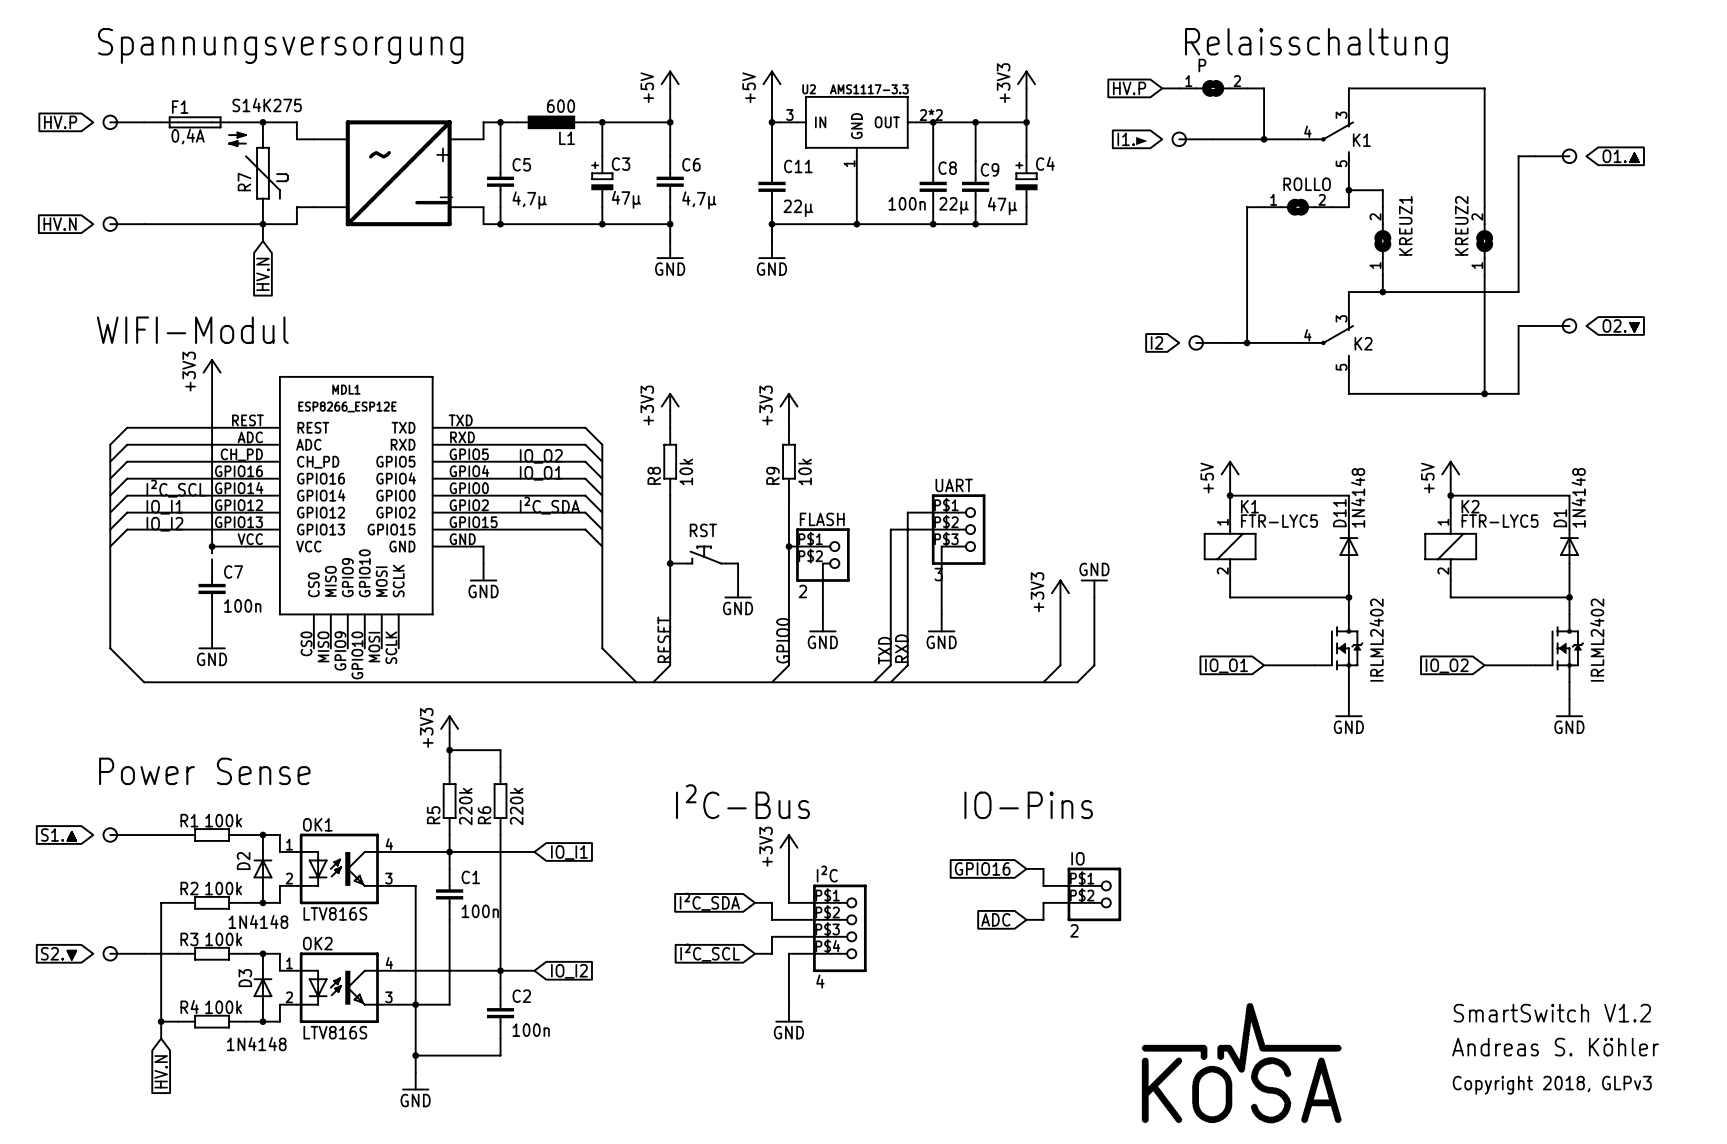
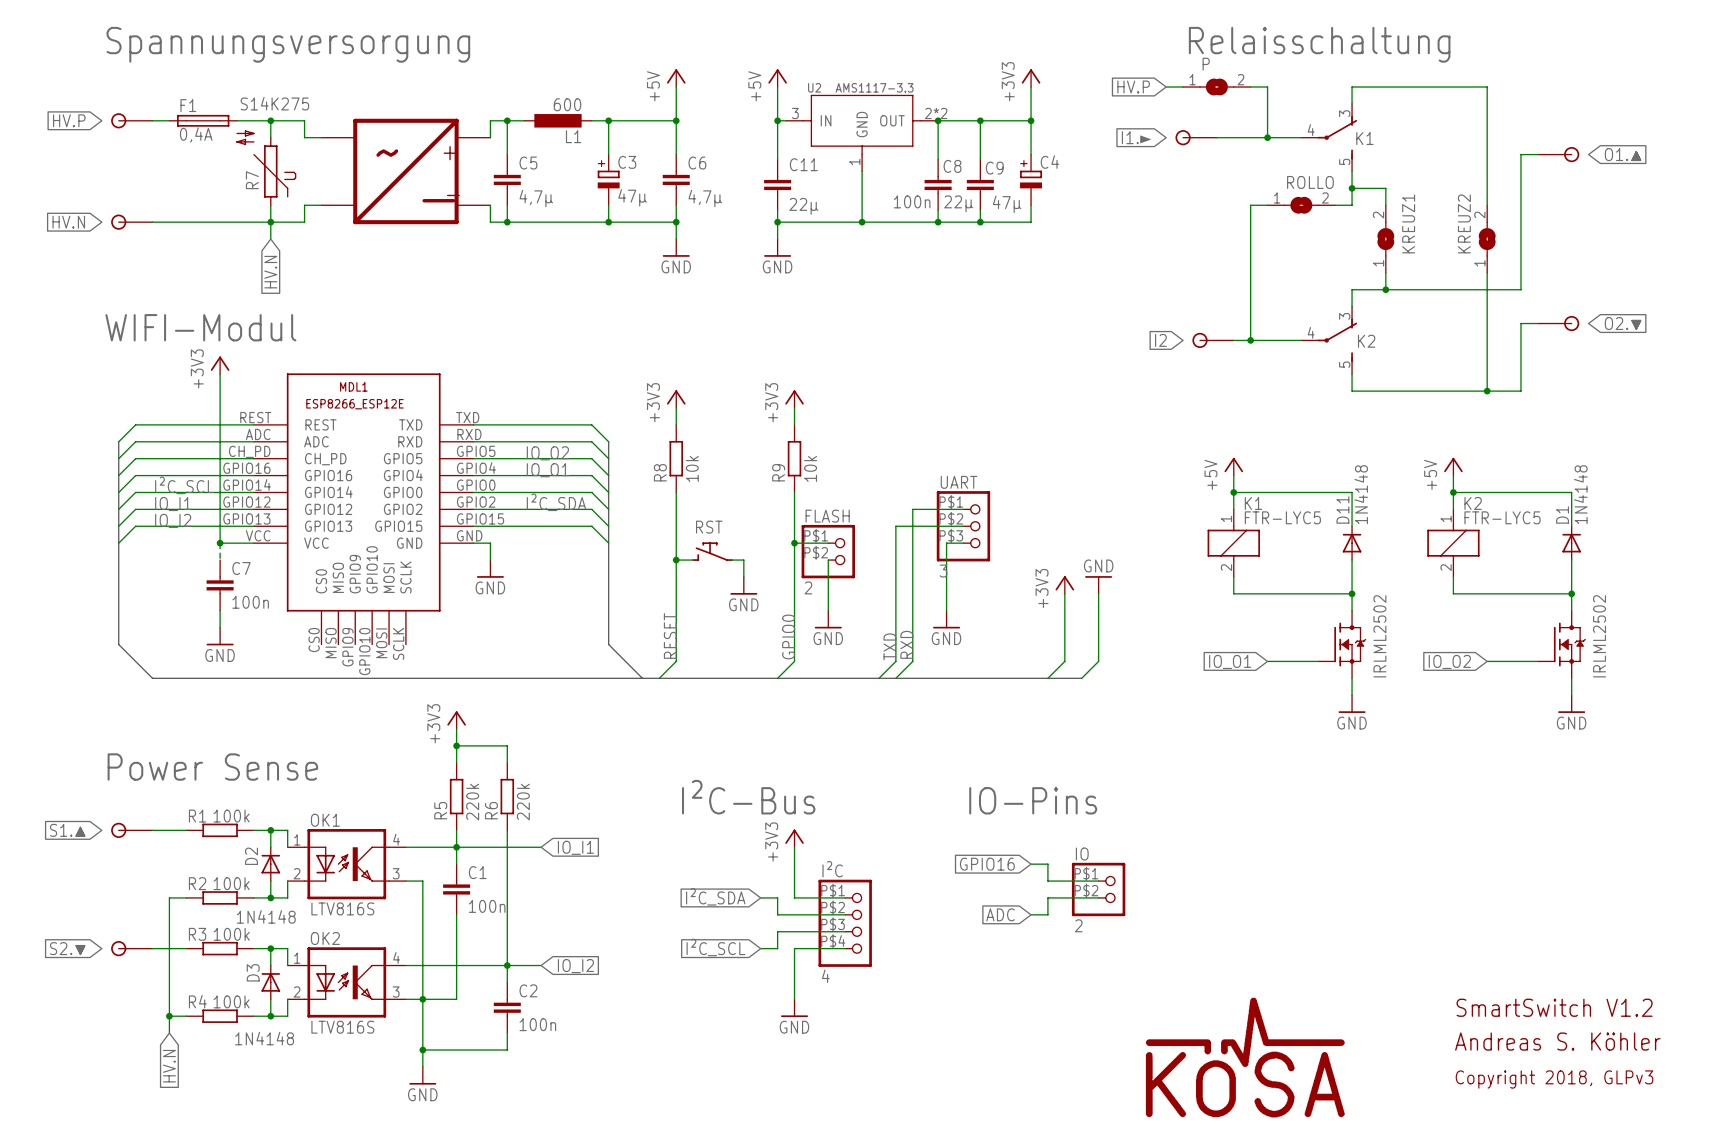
part value: IRLML2402 (1376, 640) -> IRLML2502 (1379, 636)
part value: IRLML2402 (1597, 640) -> IRLML2502 (1599, 636)

